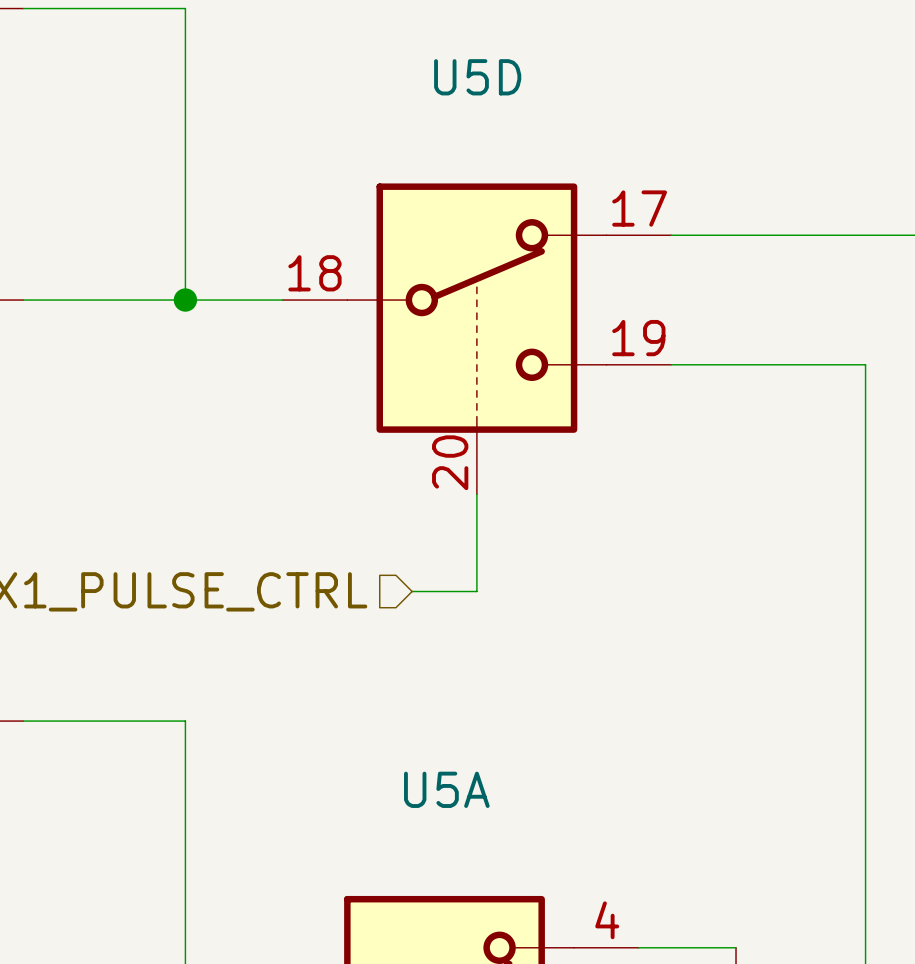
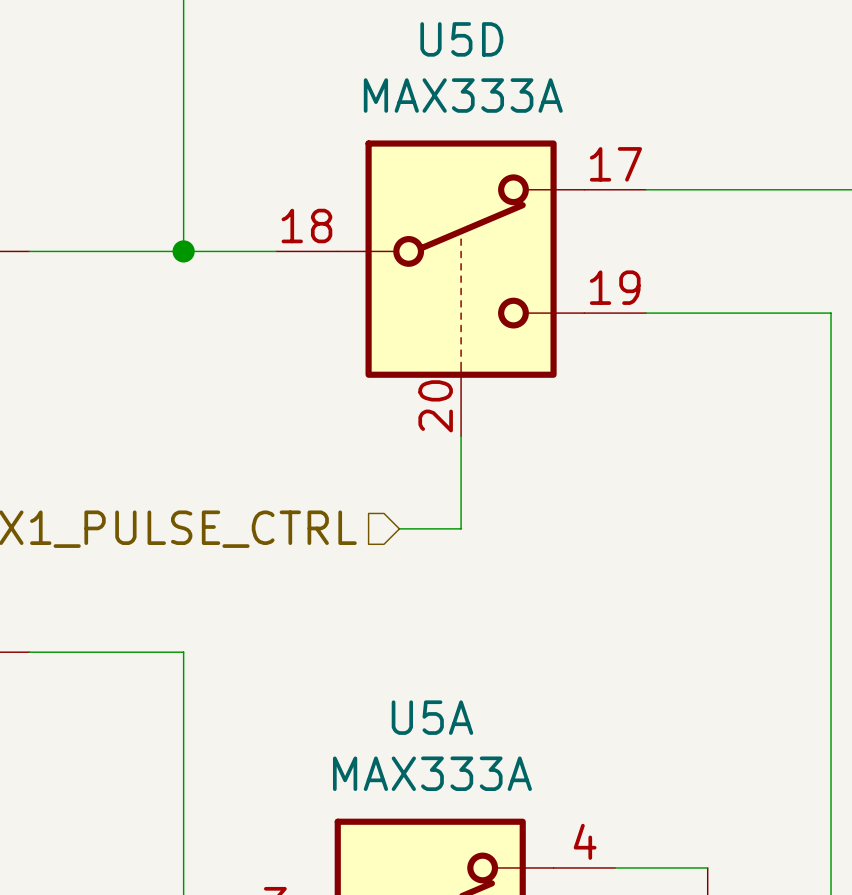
U5D value: none -> MAX333A (463, 95)
U5A value: none -> MAX333A (432, 773)

